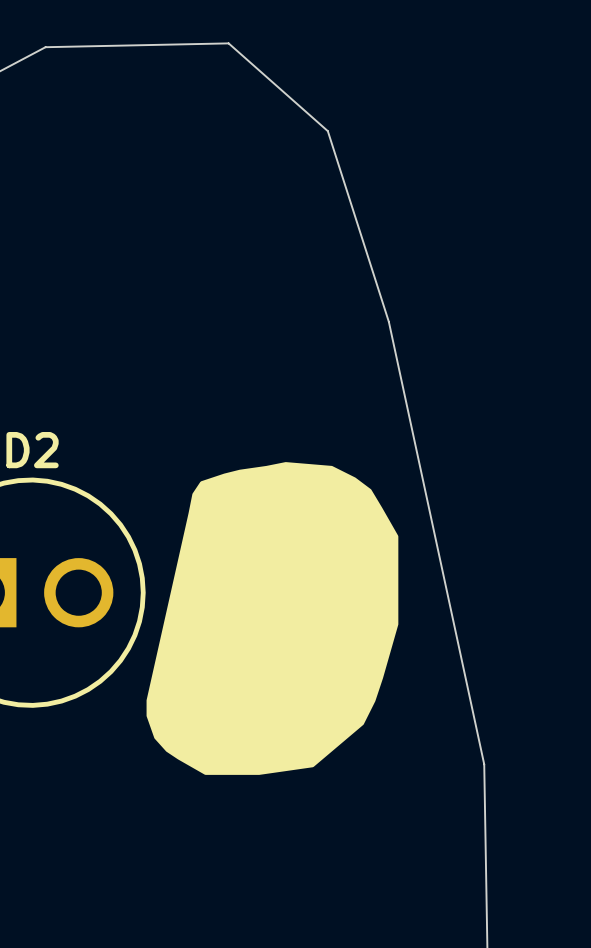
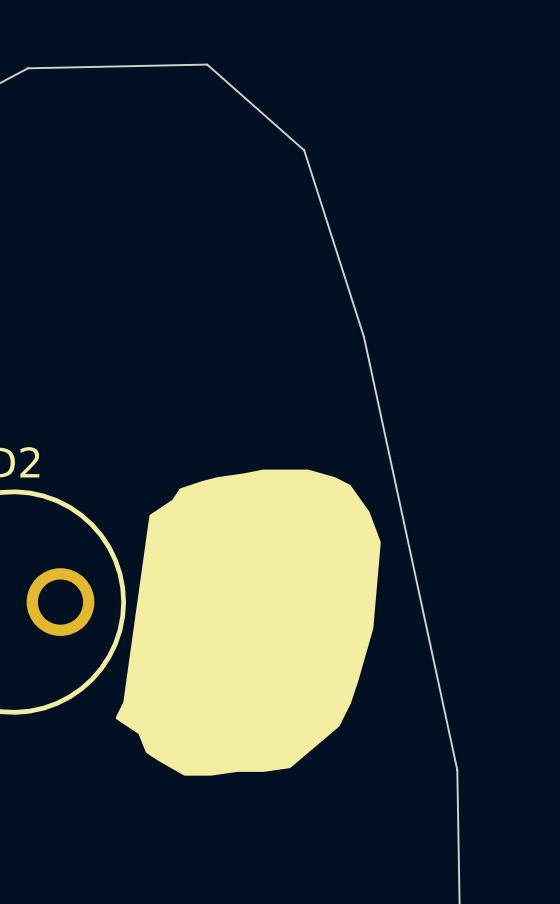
drawing shape: [146, 462, 399, 775] -> [115, 469, 381, 776]

